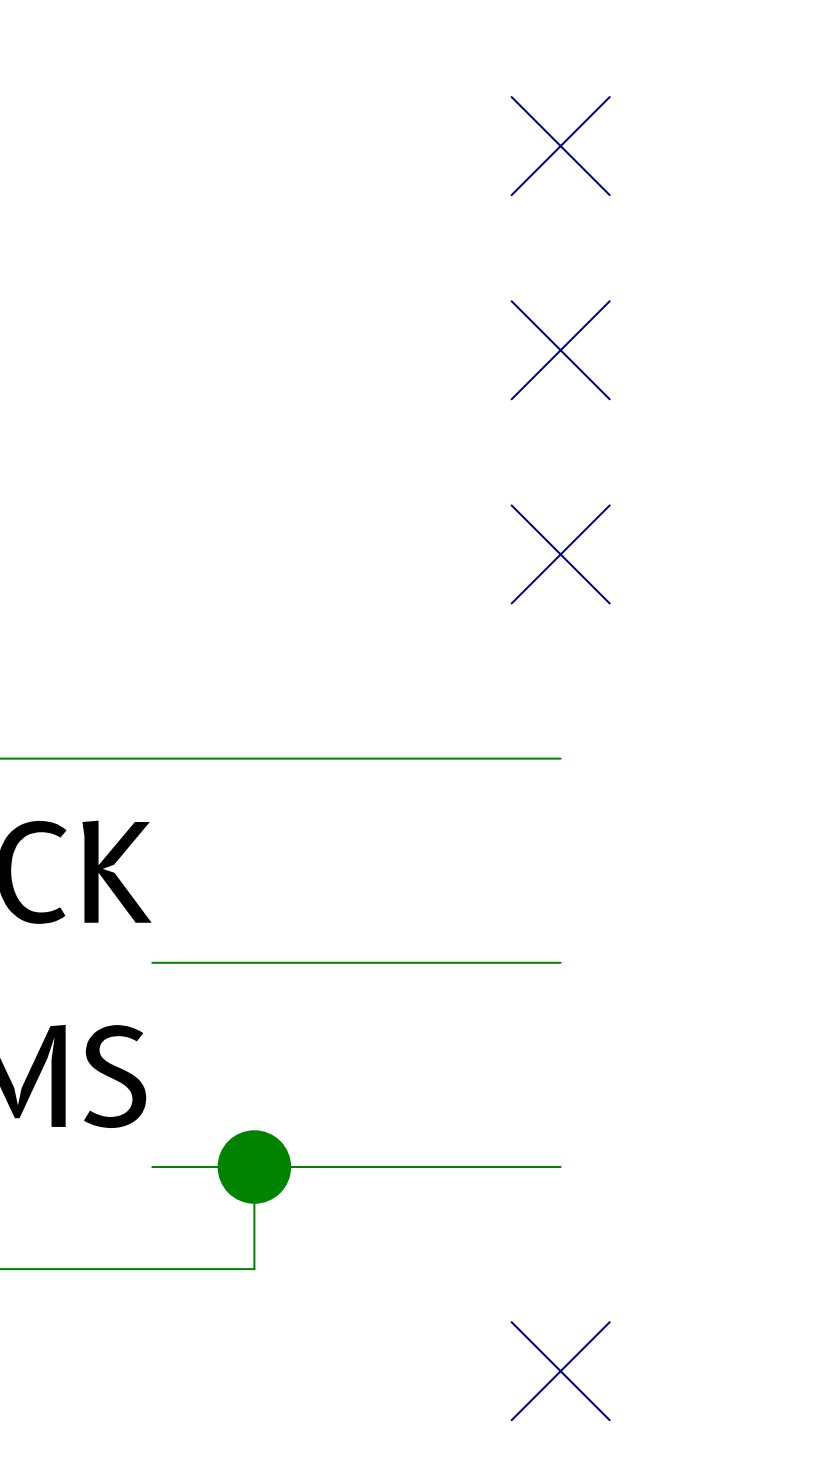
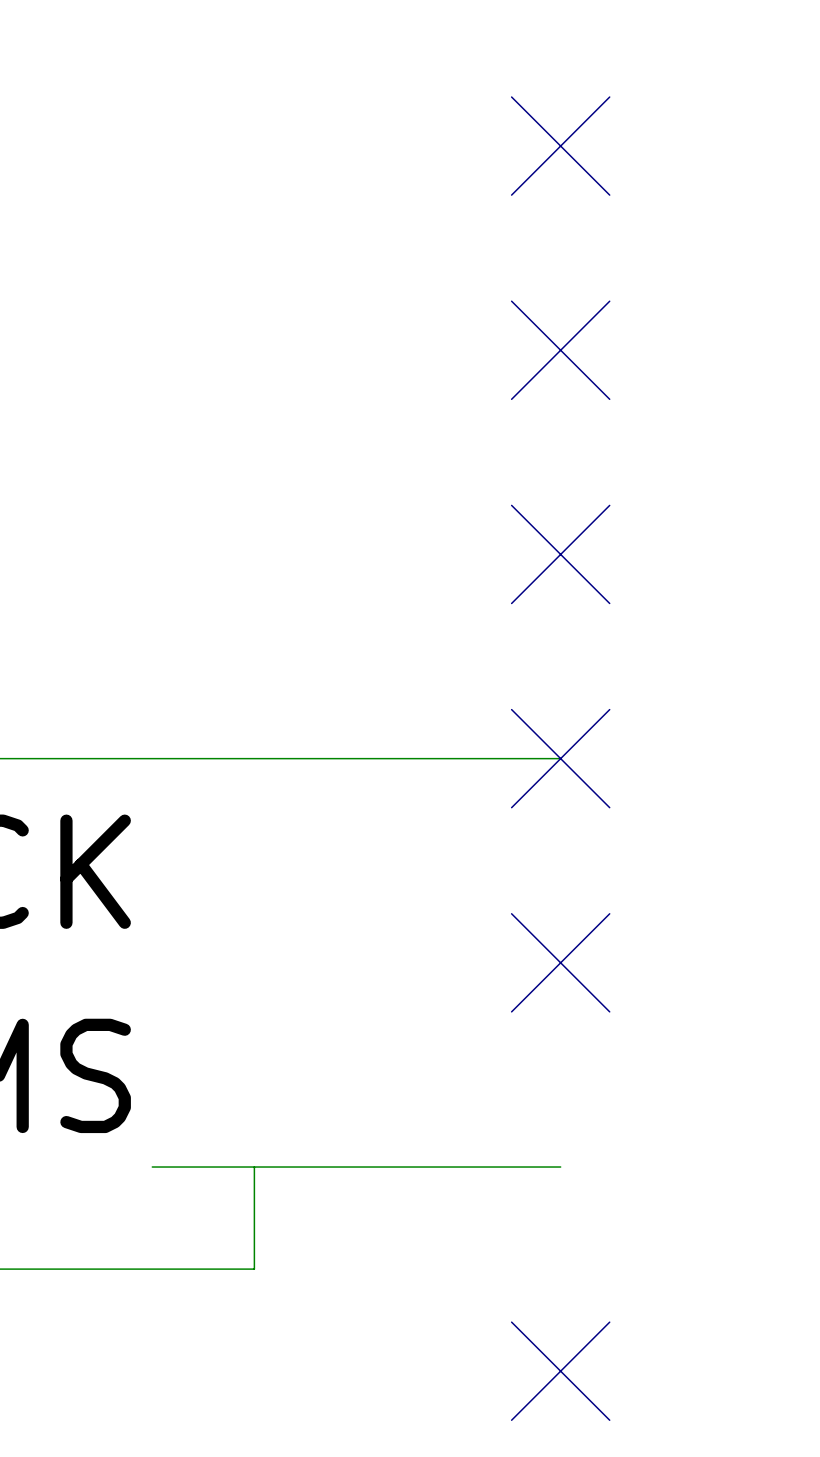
no-connect mark: none -> (560, 758)
wire: (152, 962) (560, 962) -> none
no-connect mark: none -> (560, 962)
junction: (254, 1167) -> none

